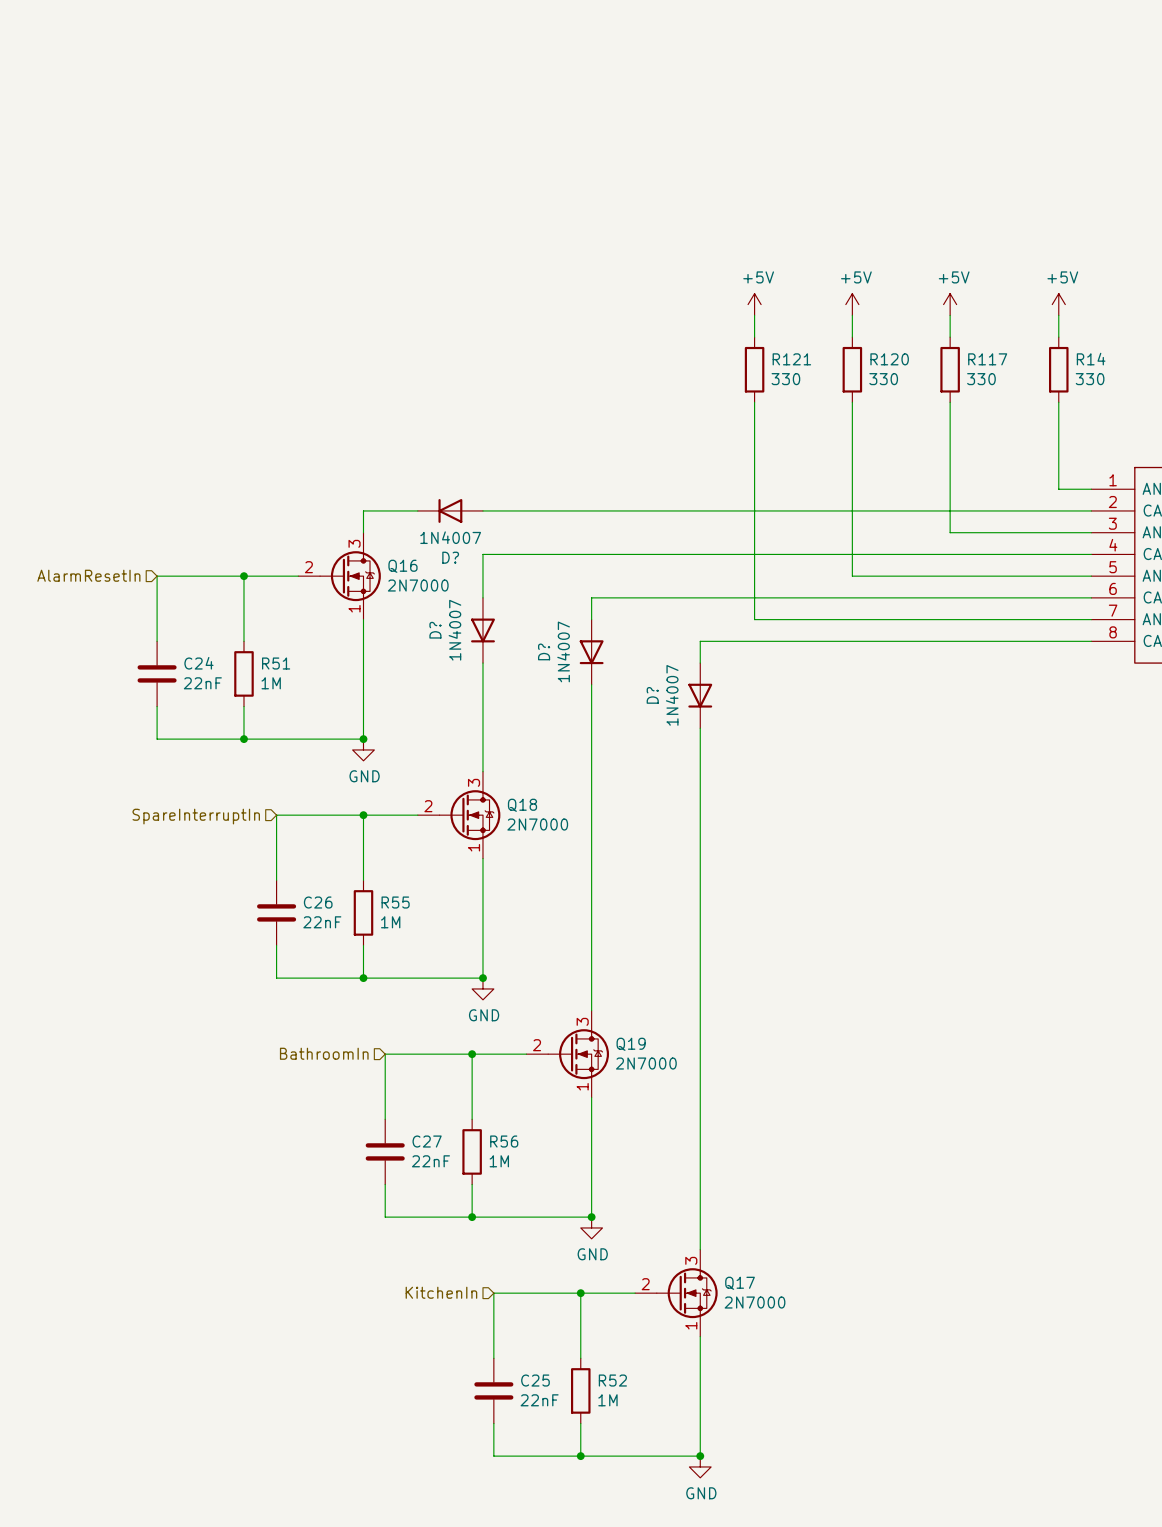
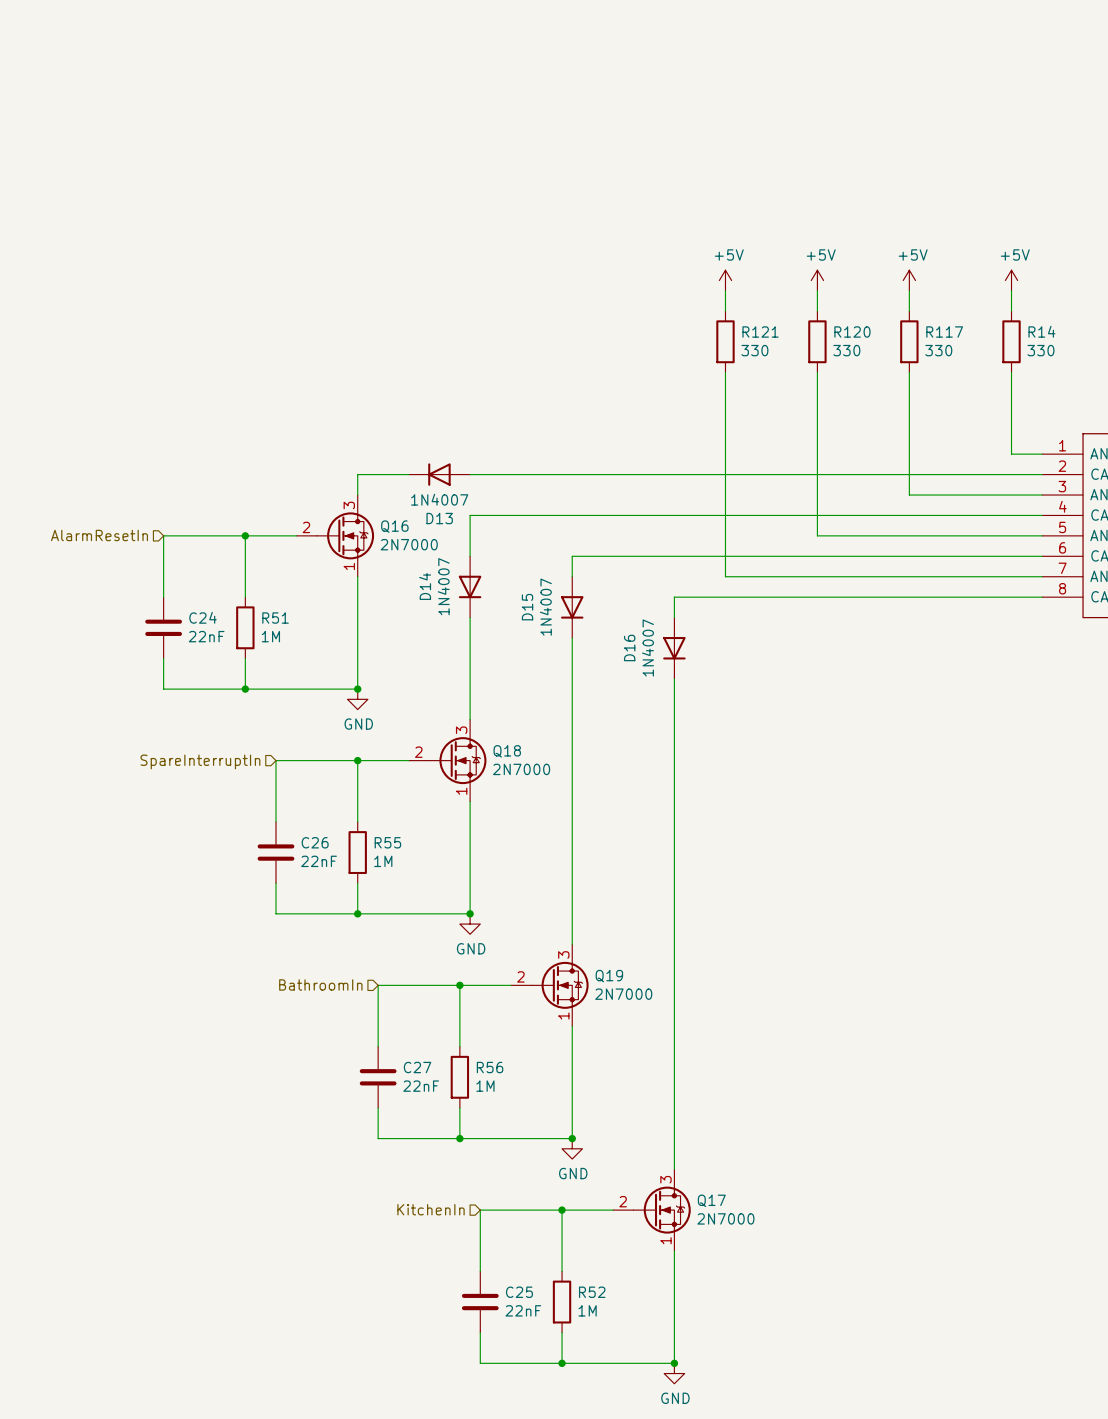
D? name: D? (450, 557) -> D13 (439, 518)
D? name: D? (435, 630) -> D14 (425, 586)
D? name: D? (544, 651) -> D15 (527, 607)
D? name: D? (652, 695) -> D16 (629, 648)

